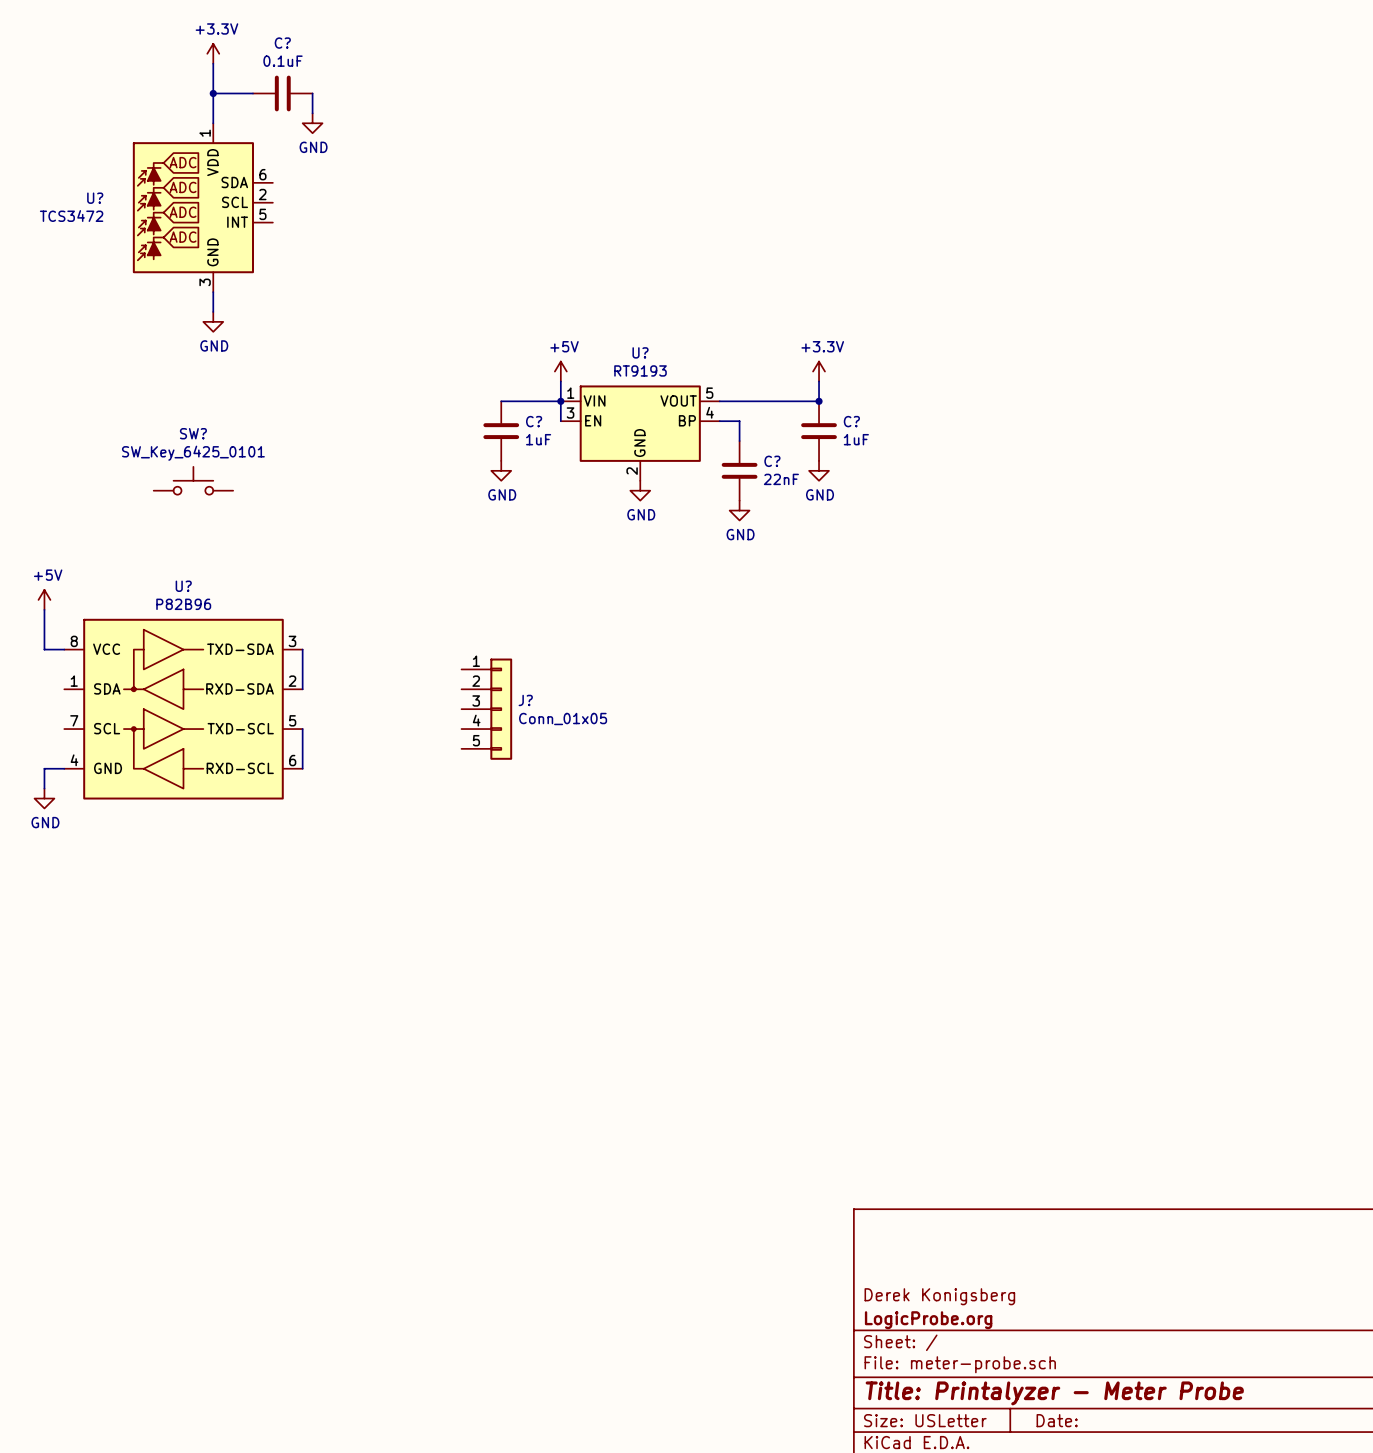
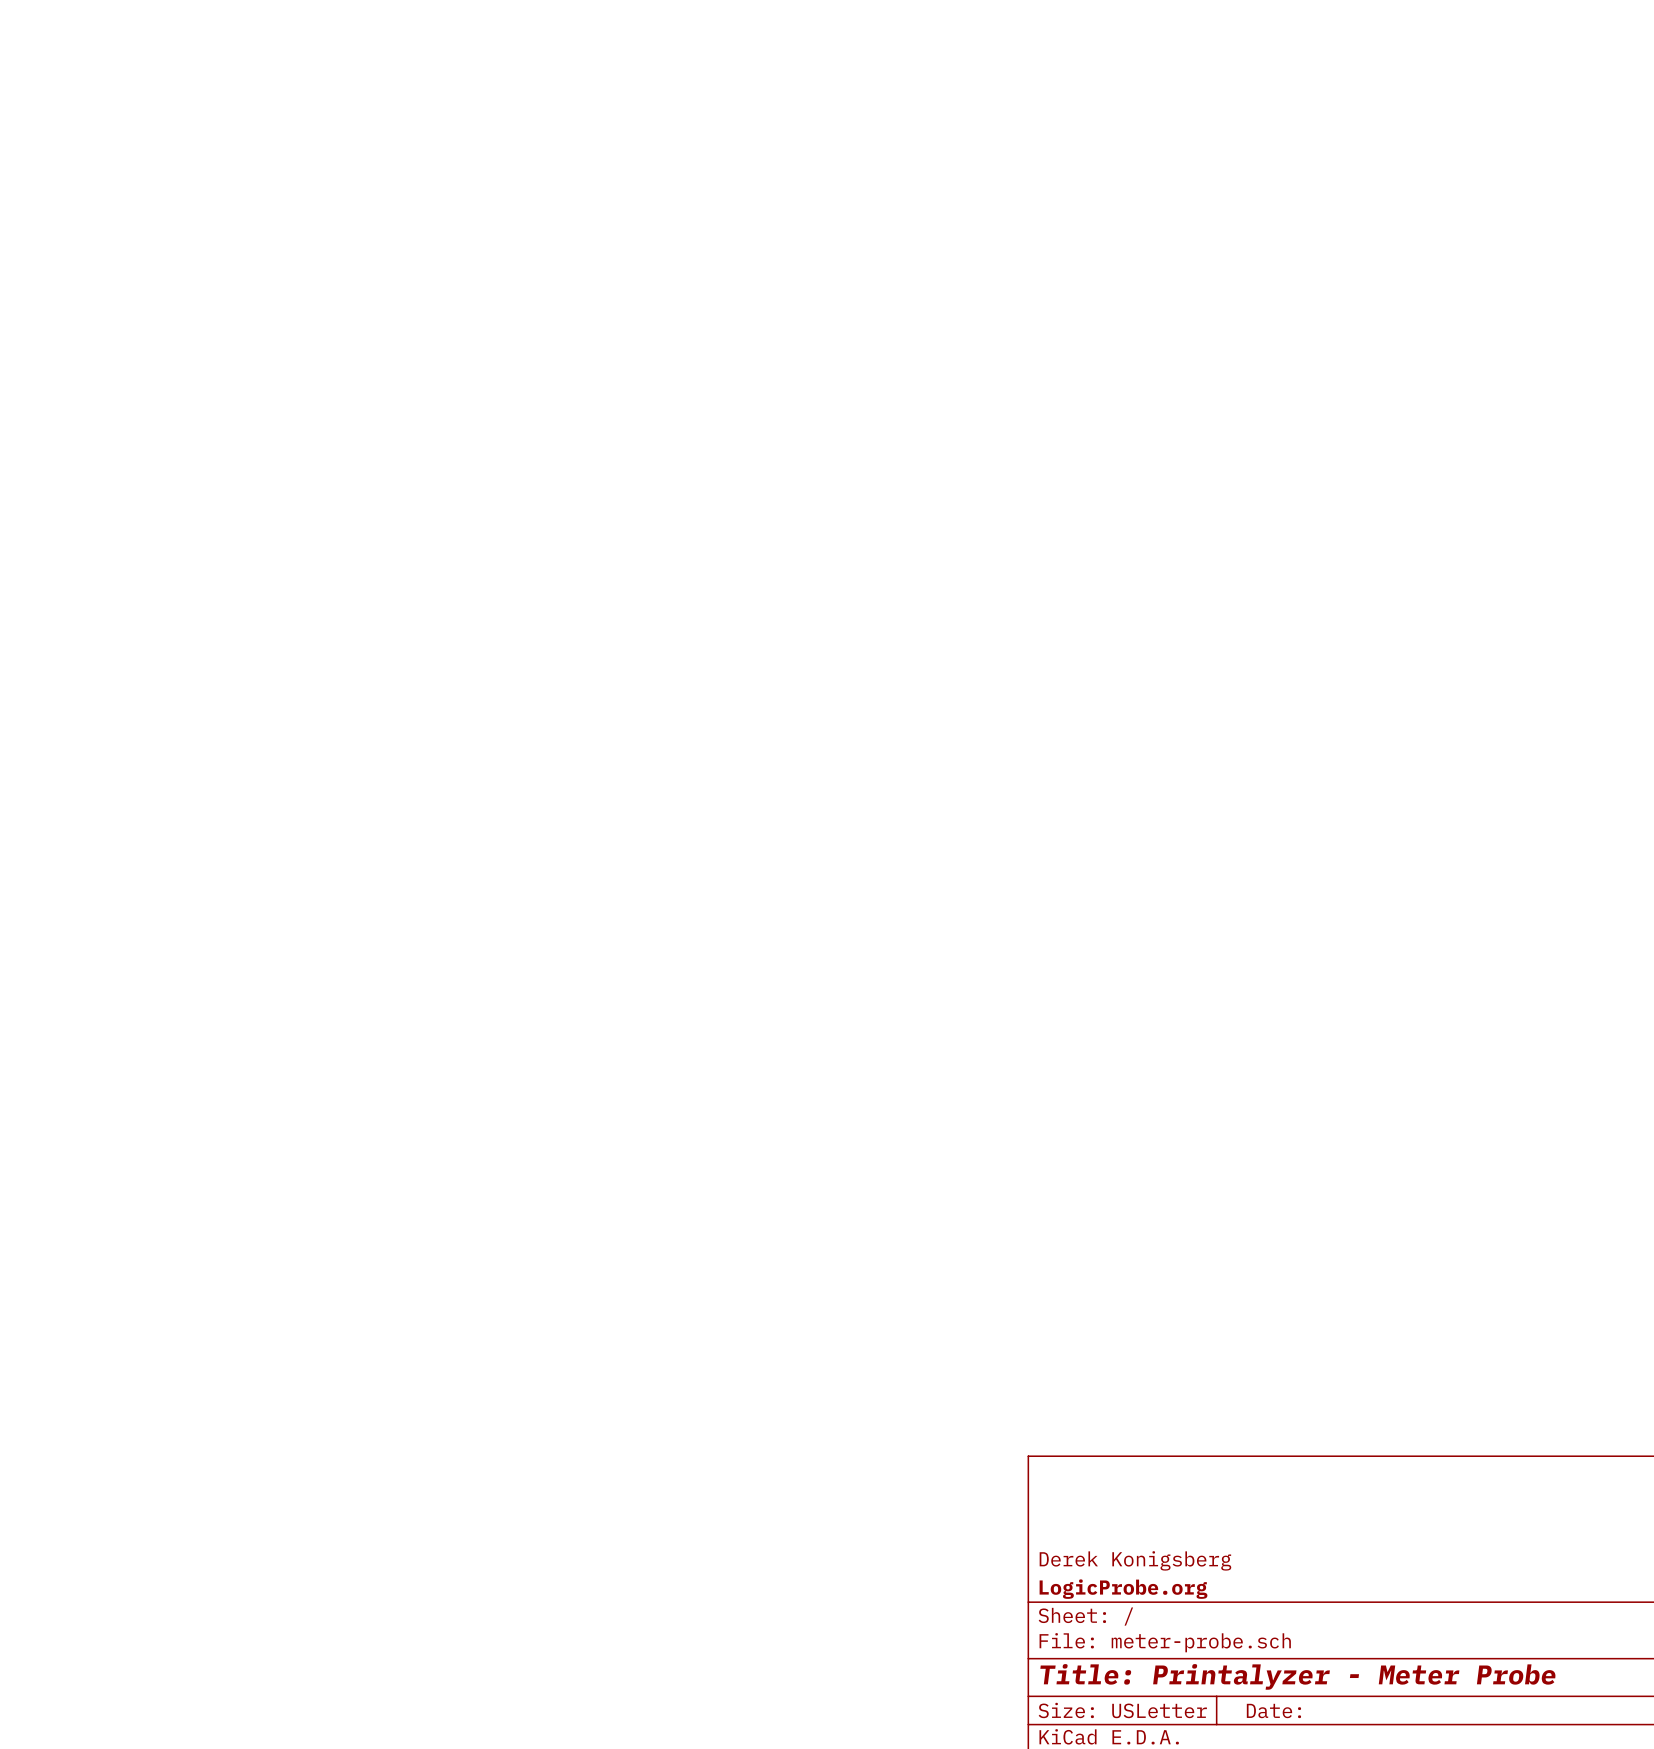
power symbol: +3.3V (213, 53) -> none
wire: (213, 63) (213, 123) -> none
wire: (213, 93) (253, 93) -> none
junction: (213, 93) -> none
C?: 0.1uF (282, 93) -> none
wire: (312, 93) (312, 113) -> none
power symbol: GND (312, 123) -> none
U?: TCS3472 (202, 207) -> none
wire: (213, 292) (213, 311) -> none
power symbol: GND (213, 321) -> none
power symbol: +5V (560, 371) -> none
power symbol: +3.3V (819, 371) -> none
wire: (560, 381) (560, 421) -> none
wire: (819, 381) (819, 401) (719, 401) -> none
wire: (501, 401) (560, 401) -> none
junction: (560, 401) -> none
junction: (819, 401) -> none
wire: (719, 421) (739, 421) (739, 441) -> none
C?: 1uF (501, 431) -> none
C?: 1uF (819, 431) -> none
U?: RT9193 (640, 433) -> none
power symbol: GND (501, 470) -> none
C?: 22nF (739, 470) -> none
power symbol: GND (819, 470) -> none
SW?: SW_Key_6425_0101 (193, 480) -> none
power symbol: GND (640, 490) -> none
power symbol: GND (739, 510) -> none
power symbol: +5V (44, 599) -> none
wire: (44, 609) (44, 649) (64, 649) -> none
wire: (302, 649) (302, 689) -> none
U?: P82B96 (183, 709) -> none
J?: Conn_01x05 (486, 709) -> none
wire: (302, 729) (302, 768) -> none
wire: (64, 768) (44, 768) (44, 788) -> none
power symbol: GND (44, 798) -> none

